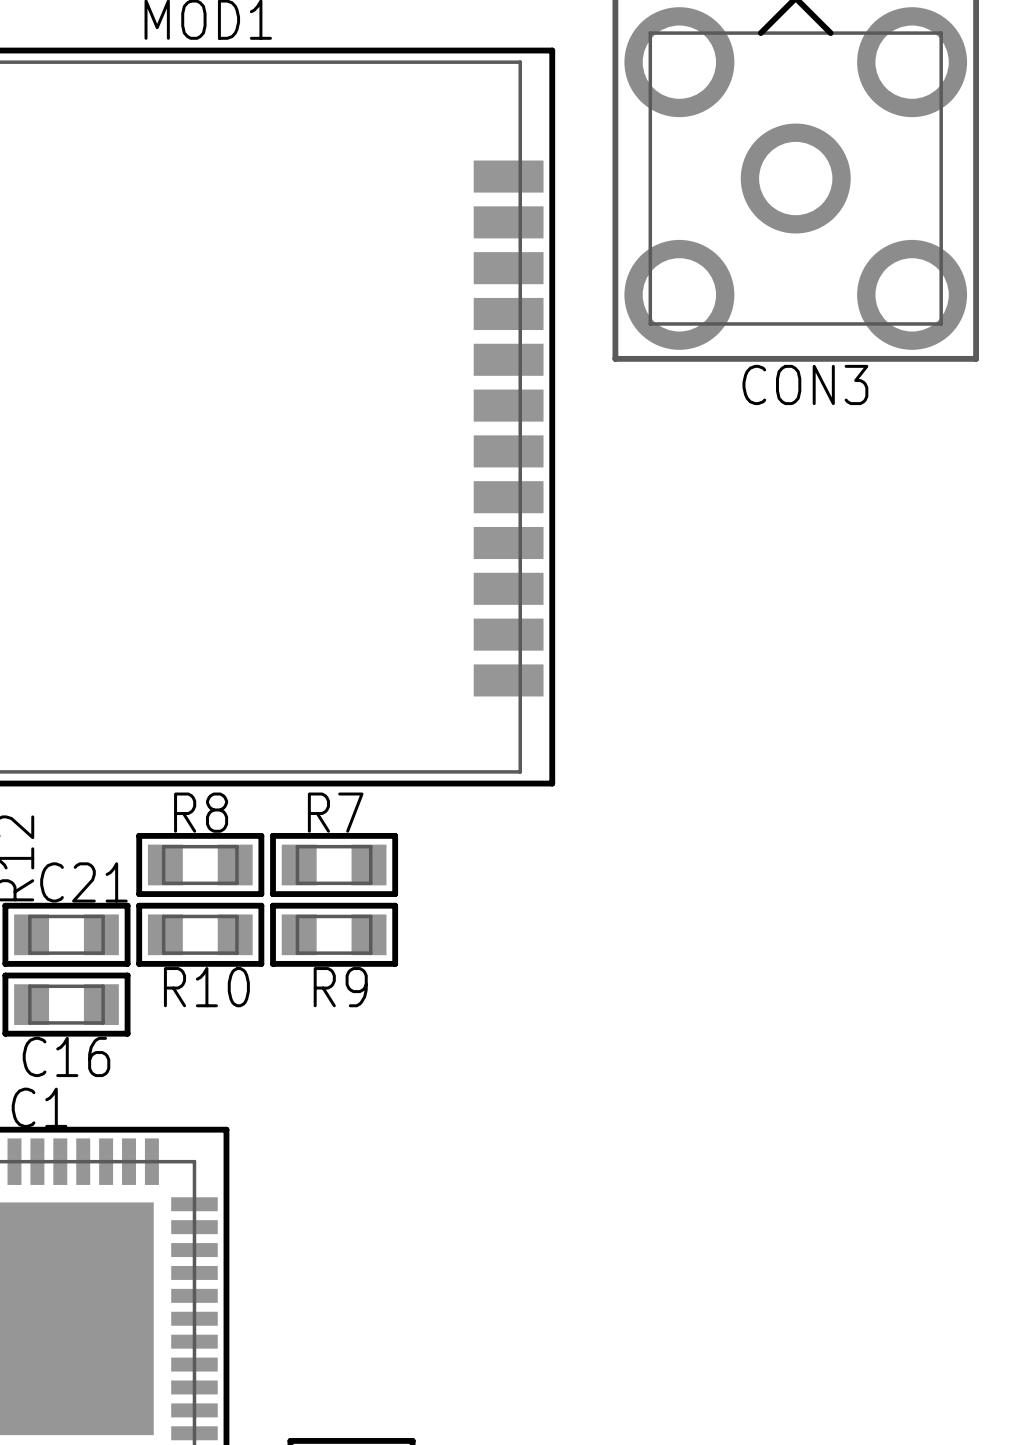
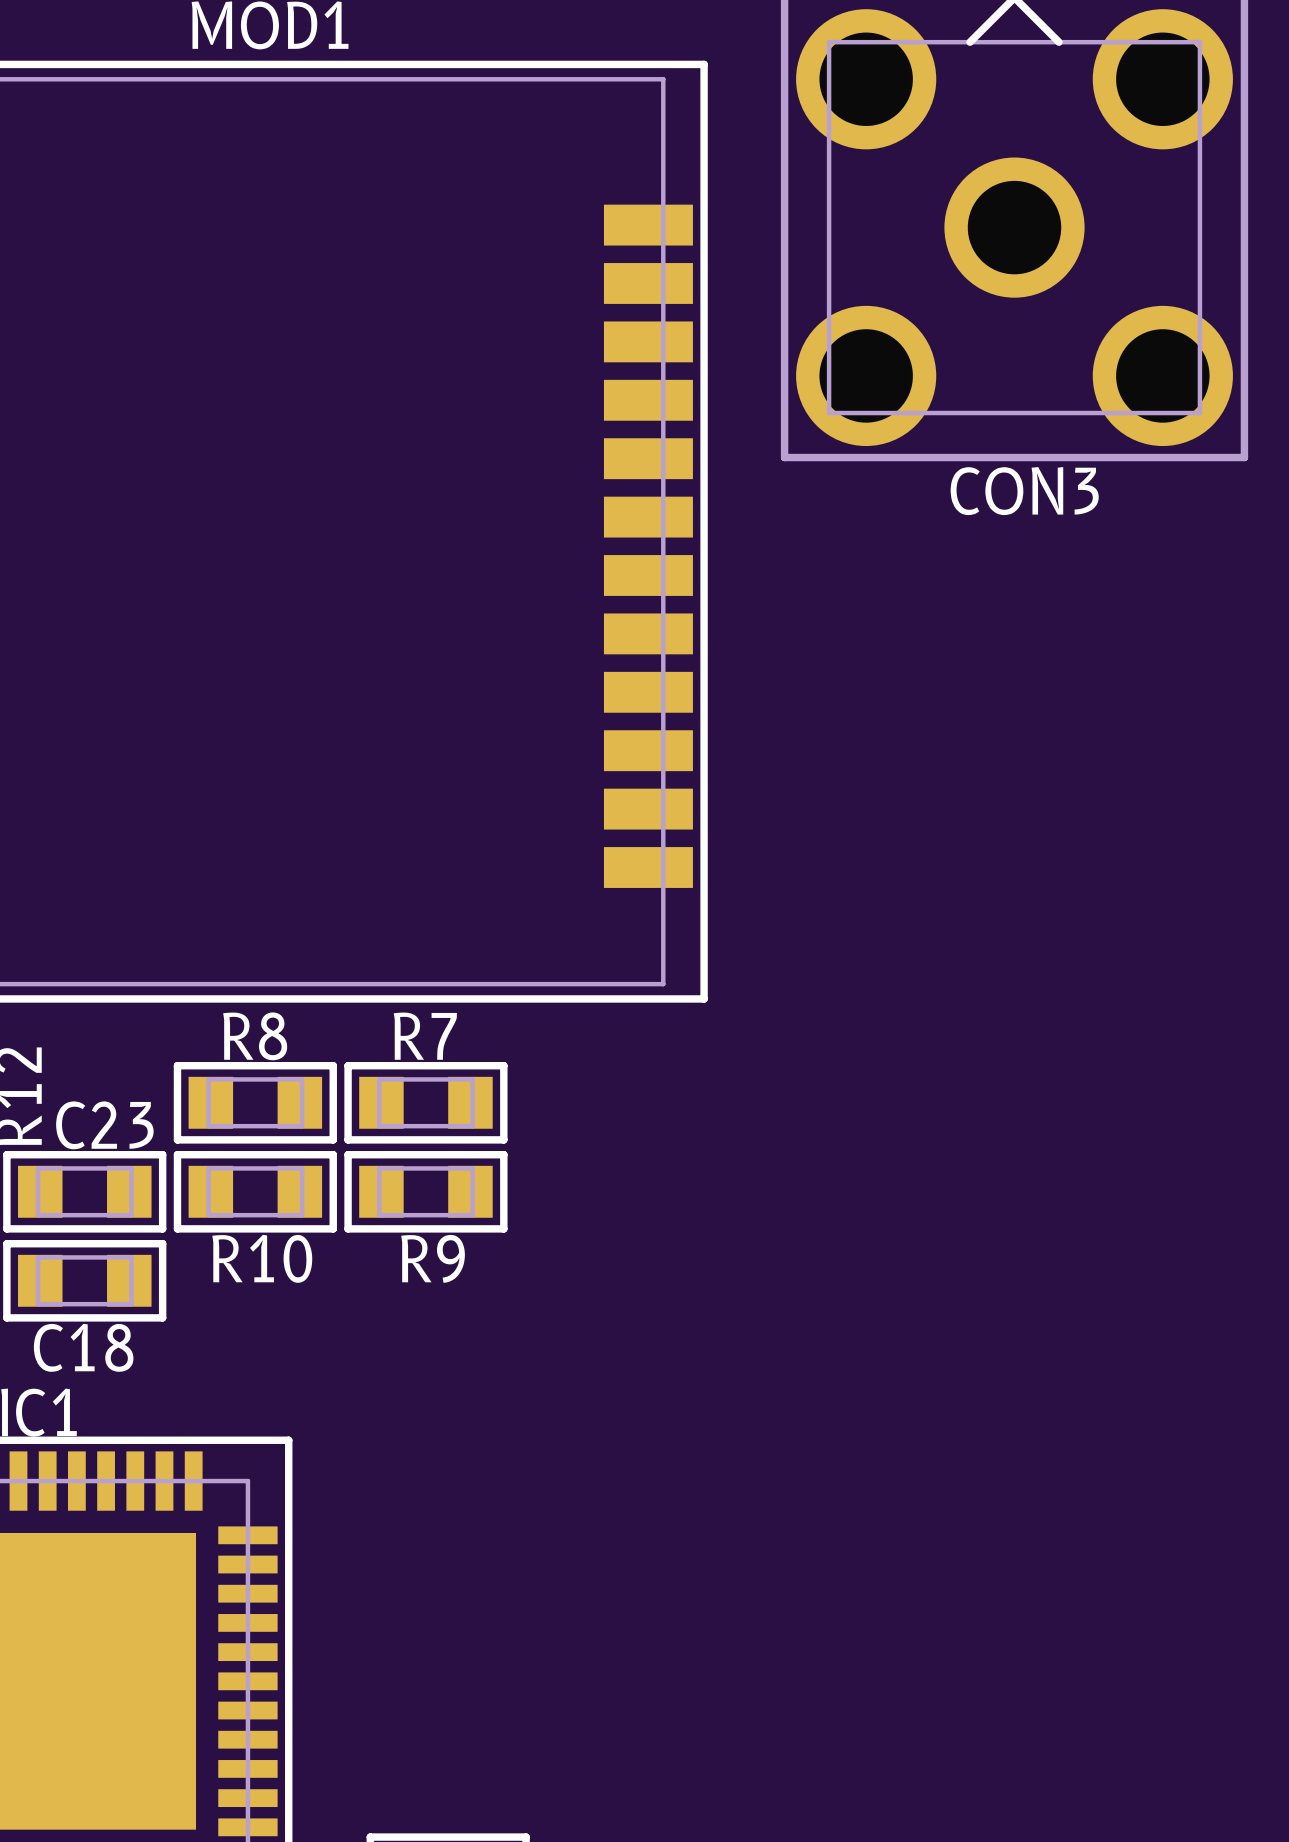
C21 name: C21 (83, 882) -> C23 (104, 1125)
C16 name: C16 (66, 1056) -> C18 (83, 1347)

